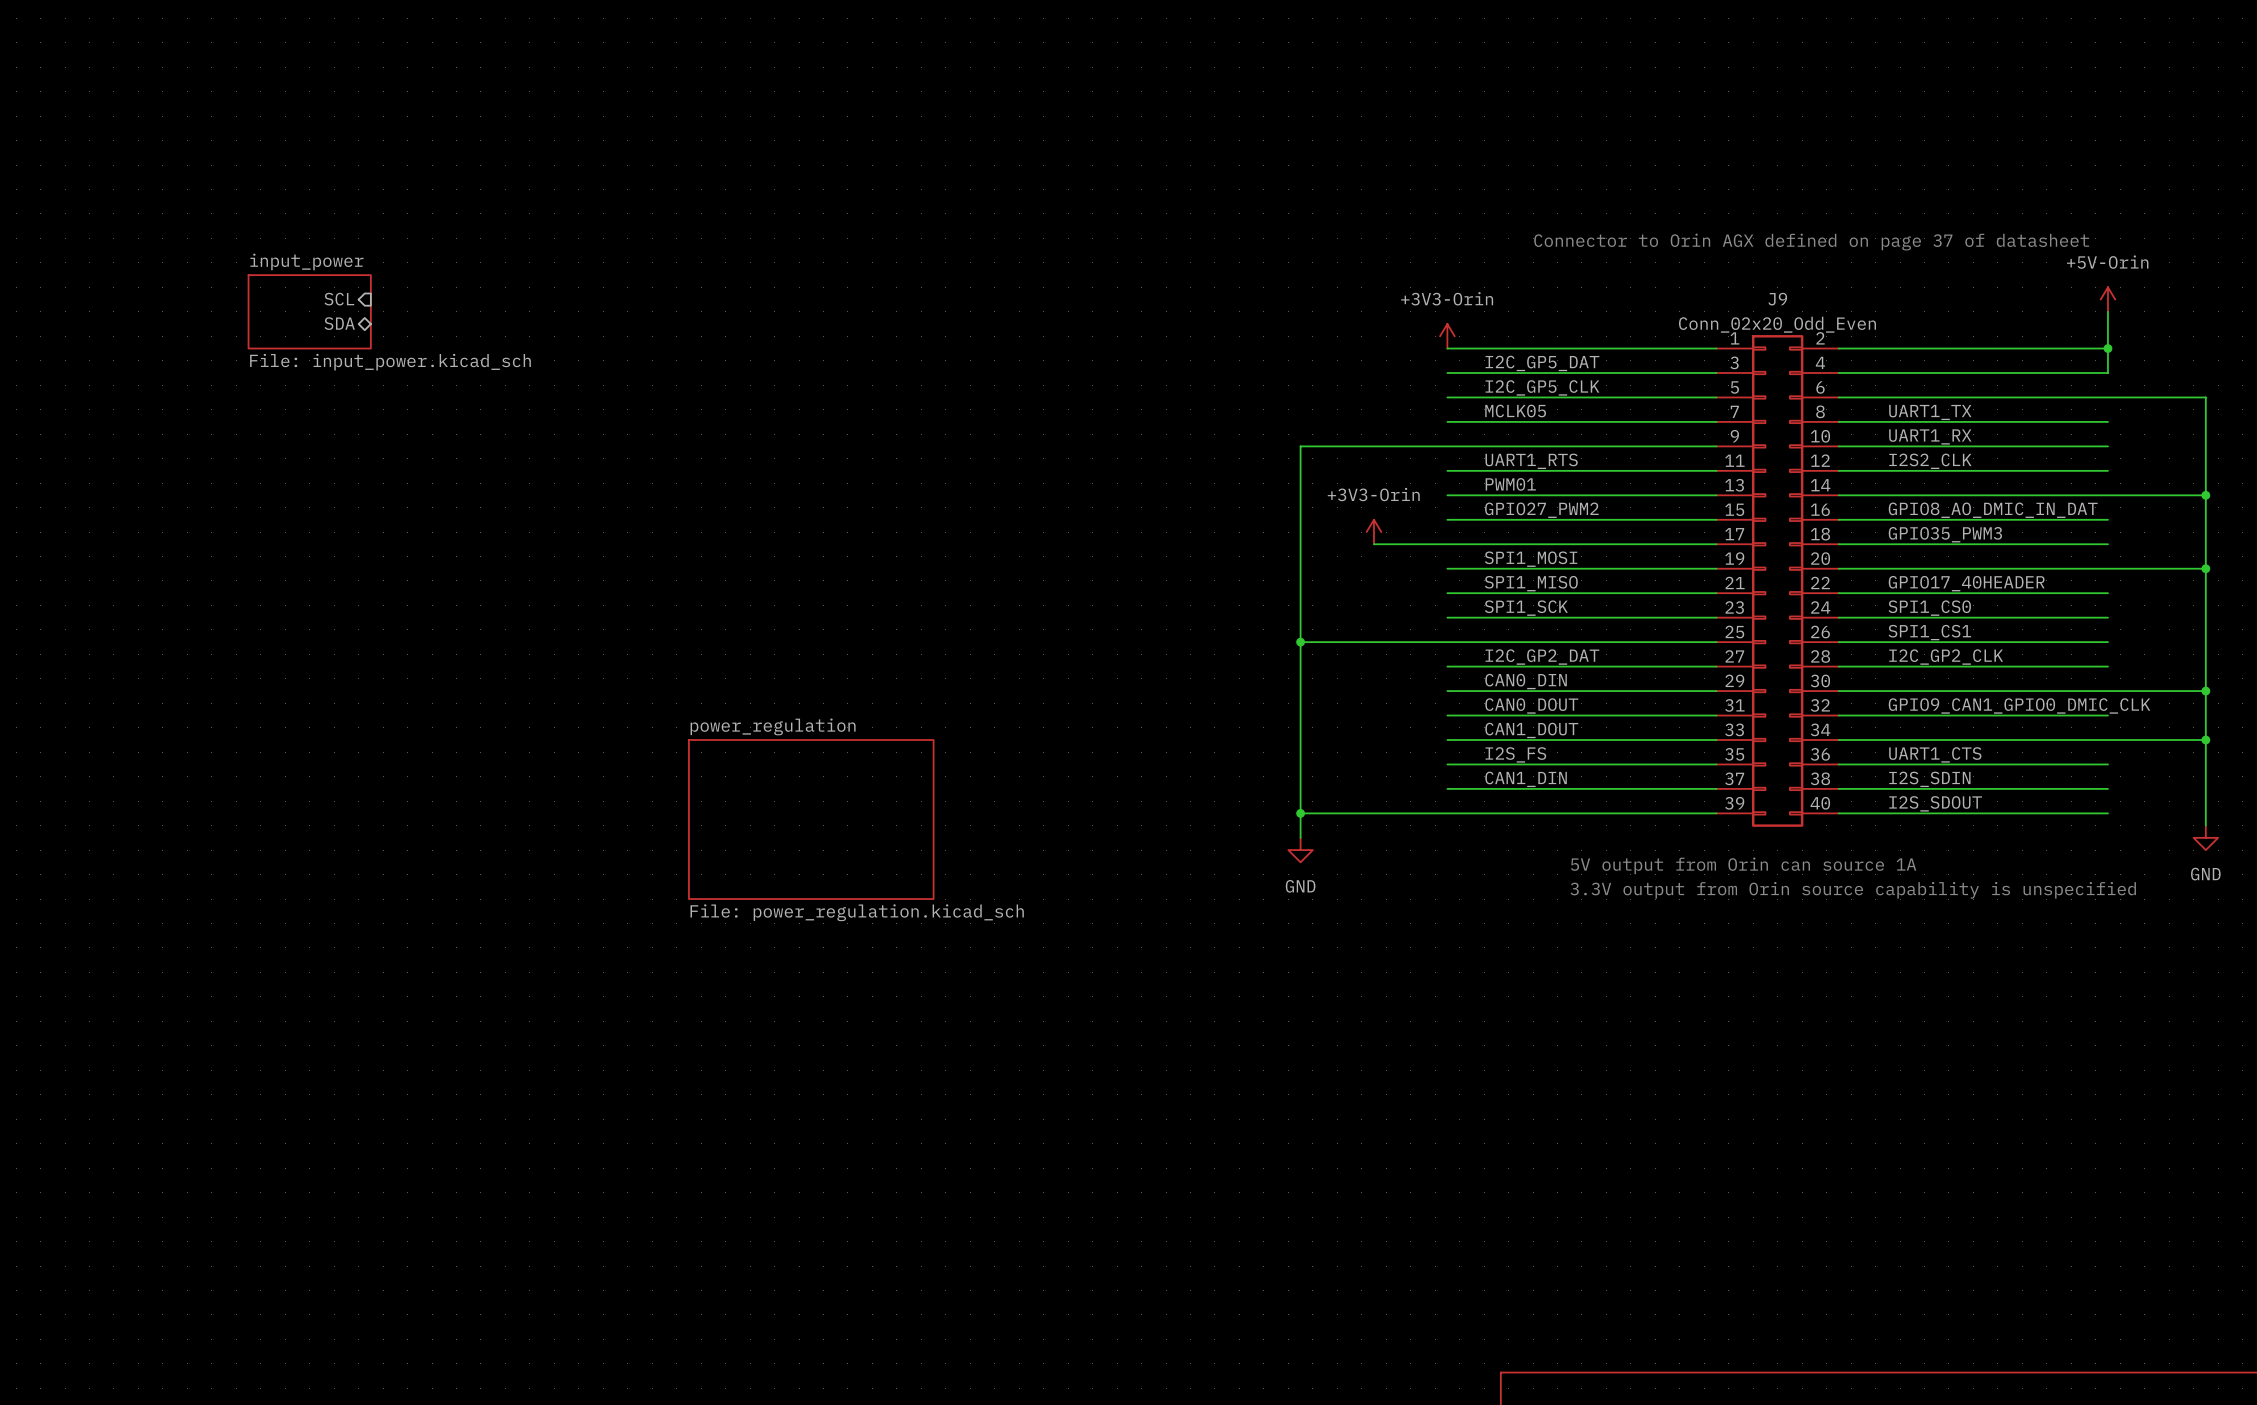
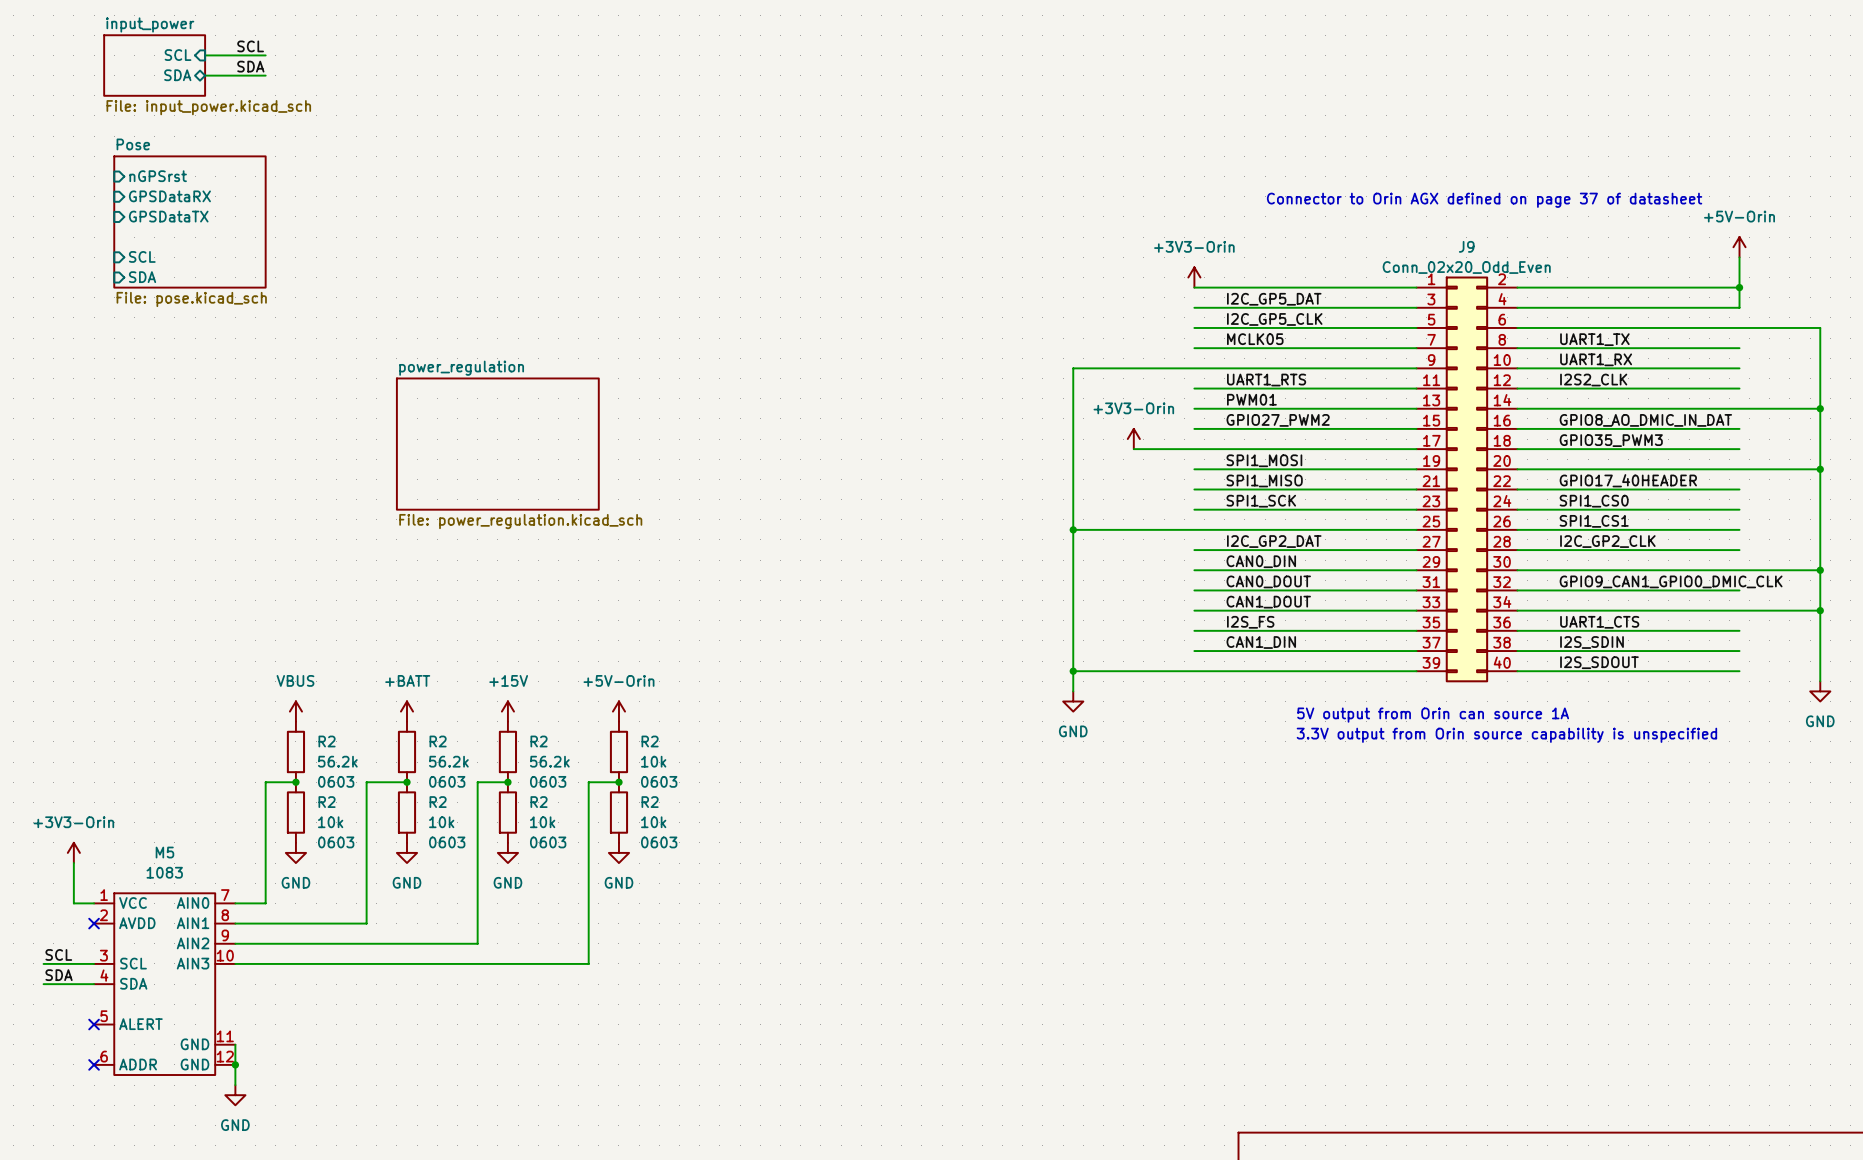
label: none -> SCL (250, 46)
sheet pin: none -> SCL (178, 55)
wire: none -> (205, 55) (265, 55)
sheet input_power: none -> File: input_power.kicad_sch (154, 65)
label: none -> SDA (250, 66)
sheet pin: none -> SDA (177, 75)
wire: none -> (205, 75) (265, 75)
sheet pin: none -> nGPSrst (158, 176)
sheet pin: none -> GPSDataRX (169, 196)
sheet pin: none -> GPSDataTX (168, 216)
sheet Pose: none -> File: pose.kicad_sch (189, 221)
sheet pin: SCL (339, 299) -> none
sheet pin: none -> SCL (142, 256)
sheet input_power: File: input_power.kicad_sch (309, 311) -> none
sheet pin: SDA (339, 323) -> none
sheet pin: none -> SDA (142, 277)
sheet power_regulation: none -> File: power_regulation.kicad_sch (497, 444)
sheet power_regulation: File: power_regulation.kicad_sch (811, 819) -> none
power symbol: none -> VBUS (295, 711)
power symbol: none -> +BATT (406, 711)
power symbol: none -> +15V (507, 711)
power symbol: none -> +5V-Orin (618, 711)
R2: none -> 56.2k (295, 751)
R2: none -> 56.2k (406, 751)
R2: none -> 56.2k (507, 751)
R2: none -> 10k (618, 751)
wire: none -> (295, 782) (265, 782) (265, 903) (235, 903)
junction: none -> (295, 782)
wire: none -> (406, 782) (366, 782) (366, 923) (235, 923)
junction: none -> (406, 782)
wire: none -> (507, 782) (477, 782) (477, 943) (235, 943)
junction: none -> (507, 782)
wire: none -> (618, 782) (588, 782) (588, 963) (235, 963)
junction: none -> (618, 782)
R2: none -> 10k (295, 812)
R2: none -> 10k (406, 812)
R2: none -> 10k (507, 812)
R2: none -> 10k (618, 812)
power symbol: none -> +3V3-Orin (73, 852)
power symbol: none -> GND (295, 852)
power symbol: none -> GND (406, 852)
power symbol: none -> GND (507, 852)
power symbol: none -> GND (618, 852)
wire: none -> (73, 863) (73, 903) (94, 903)
no-connect mark: none -> (94, 923)
label: none -> SCL (58, 954)
wire: none -> (43, 963) (94, 963)
label: none -> SDA (59, 975)
wire: none -> (43, 984) (94, 984)
M5: none -> 1083 (164, 984)
no-connect mark: none -> (94, 1024)
wire: none -> (235, 1044) (235, 1085)
no-connect mark: none -> (94, 1064)
junction: none -> (235, 1064)
power symbol: none -> GND (235, 1095)

